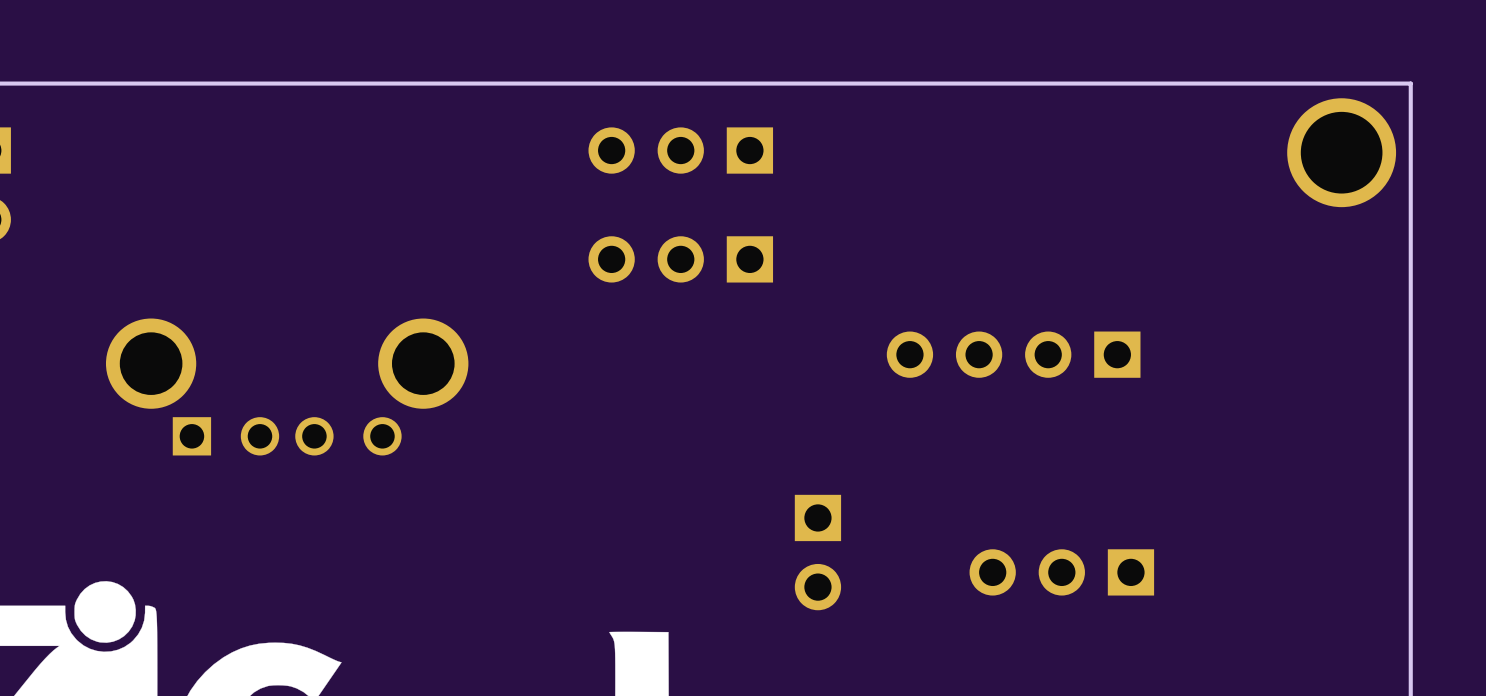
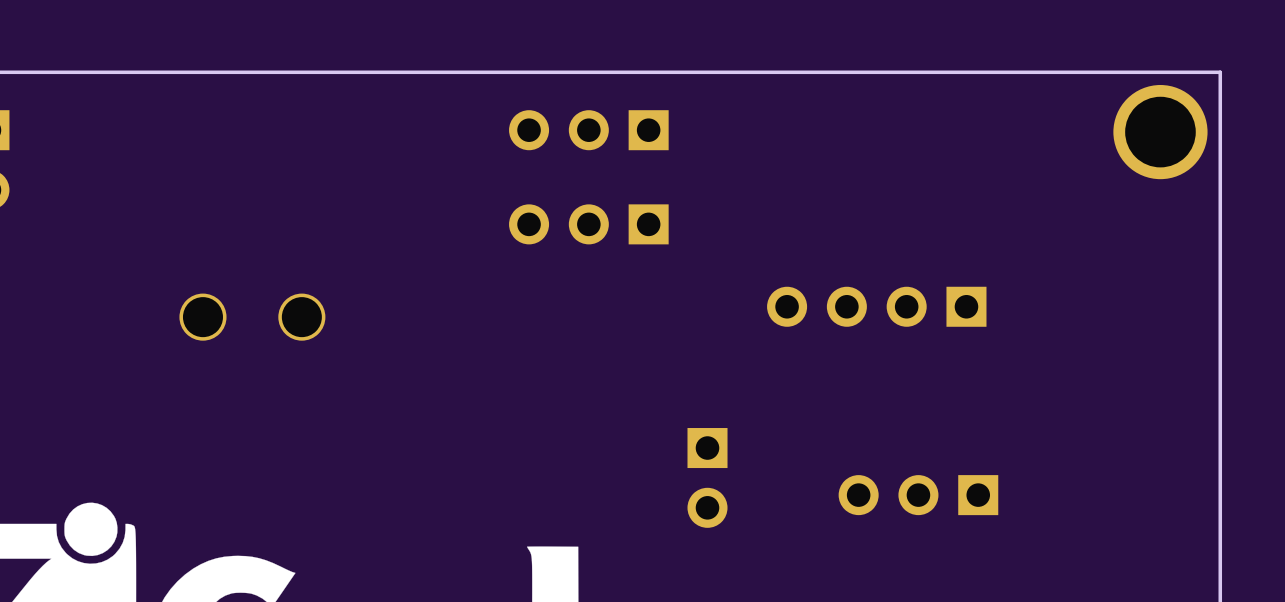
part footprint: [105, 318, 469, 456] -> [179, 293, 326, 341]

